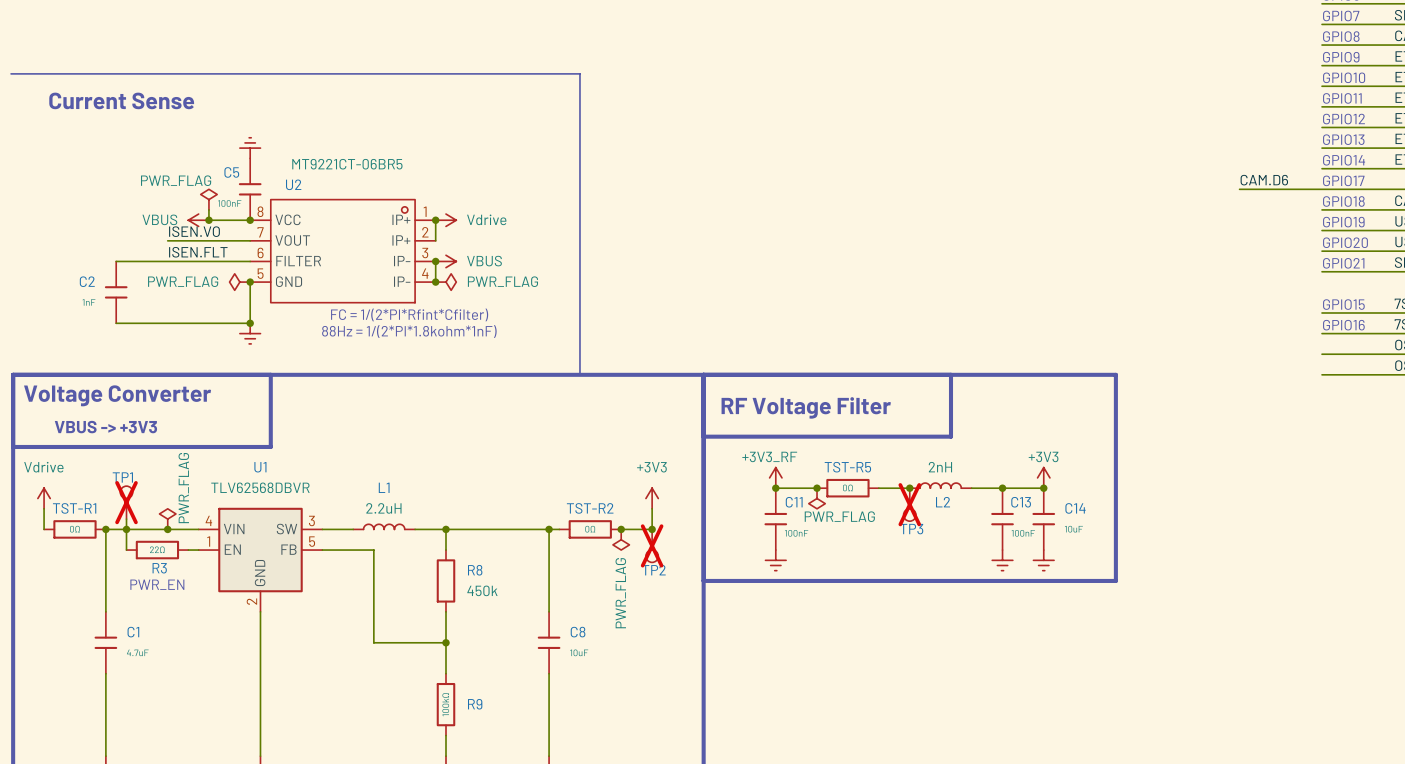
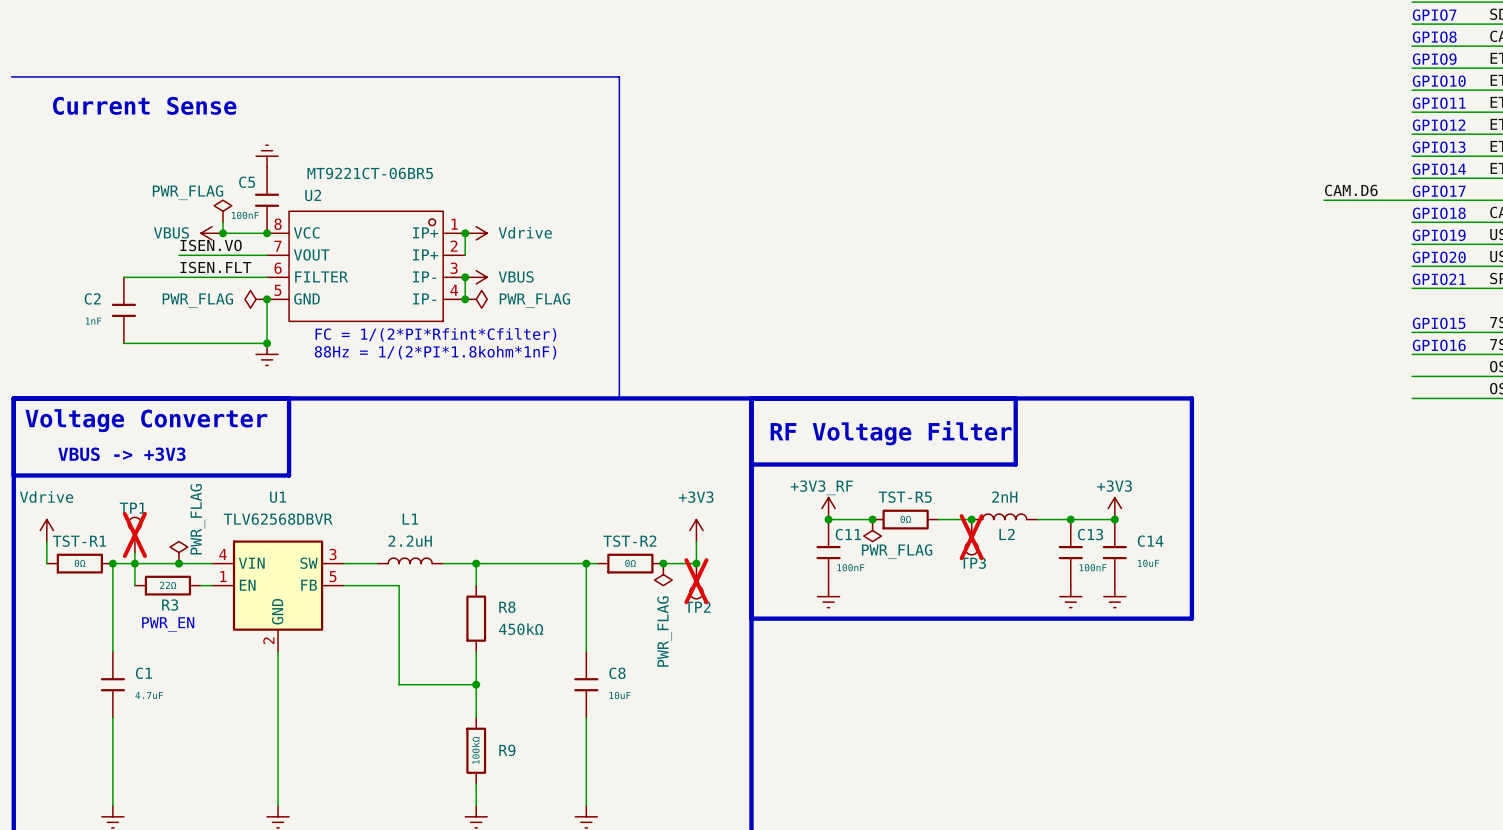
R8 value: 450k (482, 590) -> 450kΩ (521, 629)

